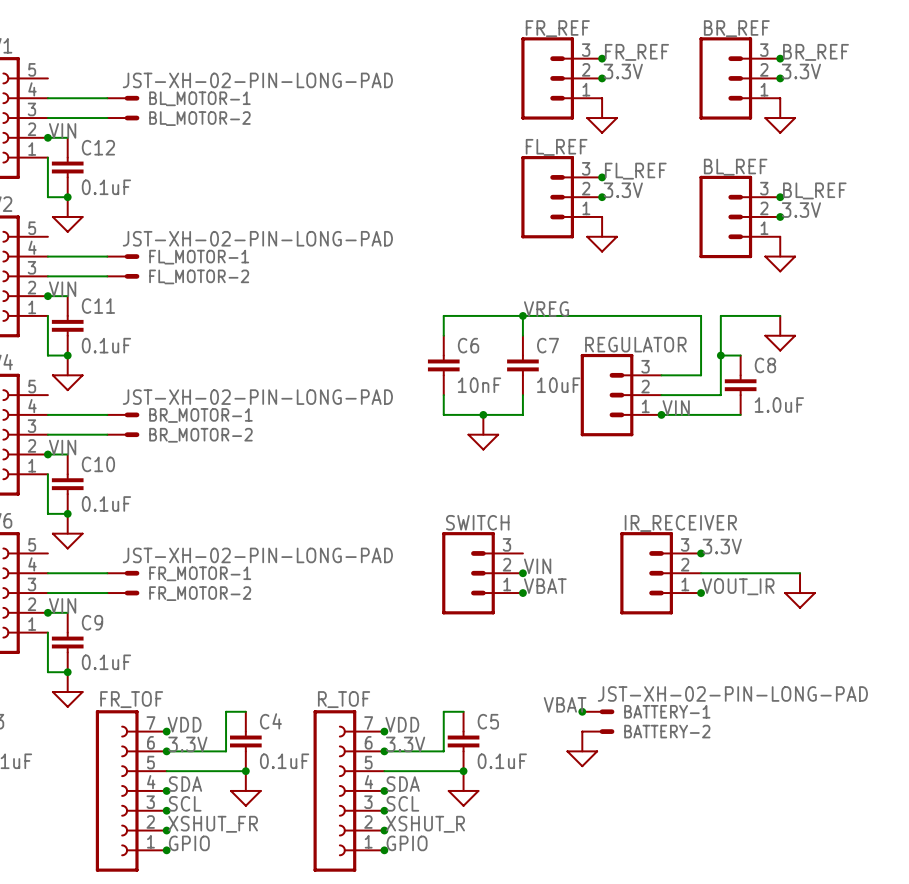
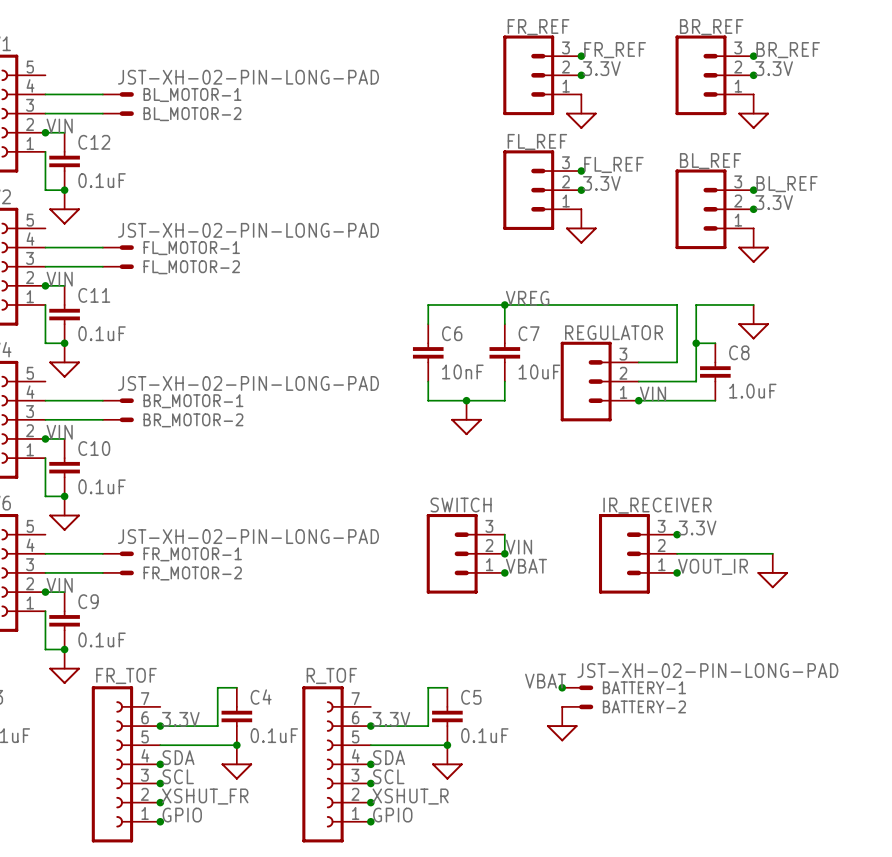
wire: none -> (504, 534) (504, 553)
label: VDD (184, 724) -> none
label: VDD (402, 724) -> none
junction: (166, 731) -> none
junction: (384, 731) -> none

